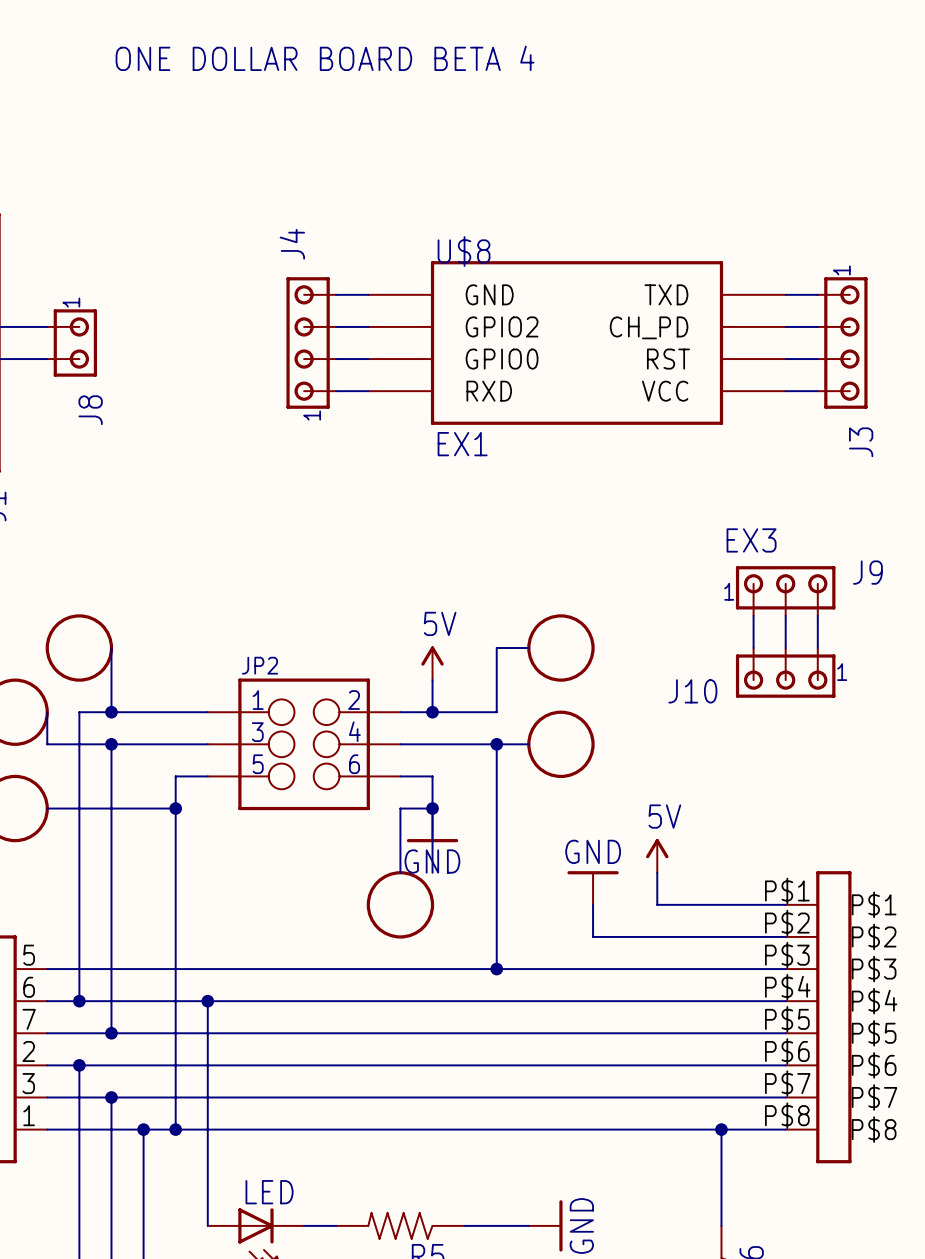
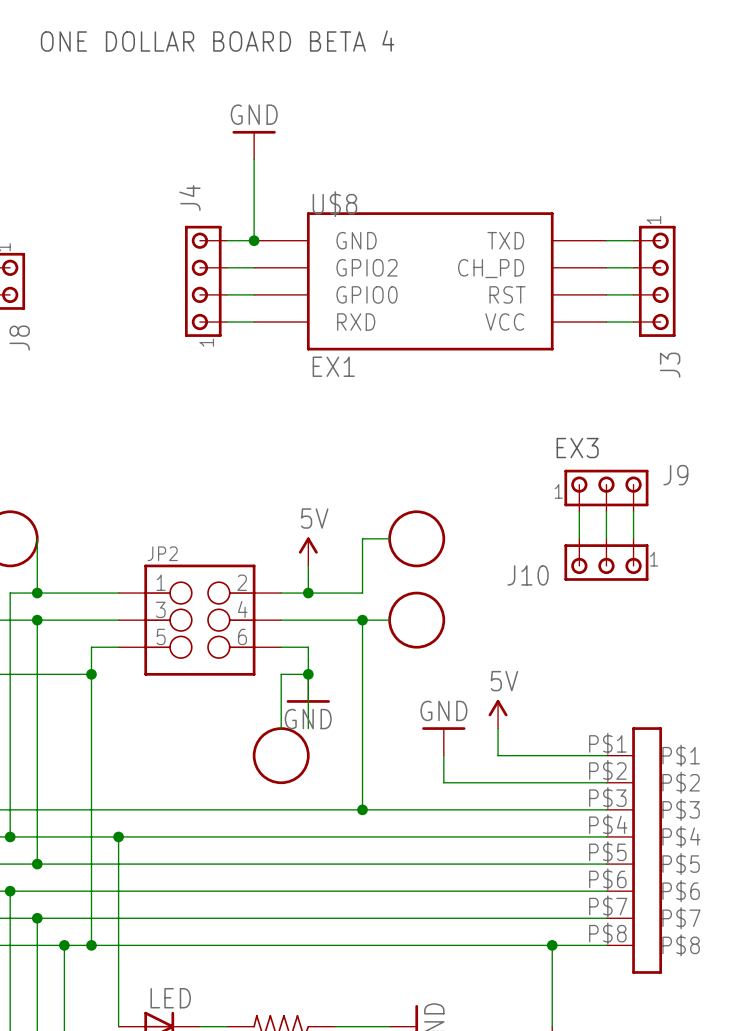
power symbol: none -> GND (254, 145)
wire: none -> (254, 159) (254, 240)
junction: none -> (254, 240)

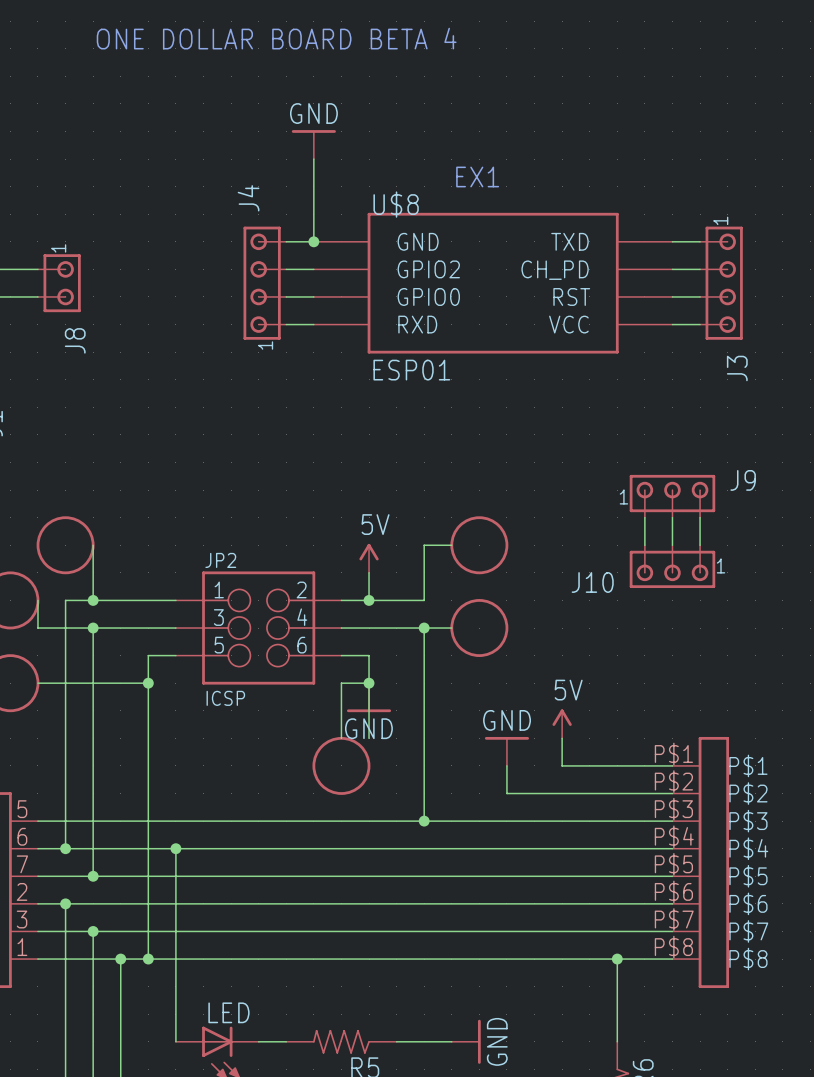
text: none -> EX1 (477, 176)
U$8 value: EX1 (333, 366) -> ESP01 (411, 370)
text: EX3 (577, 448) -> none
JP2 value: none -> ICSP (225, 698)

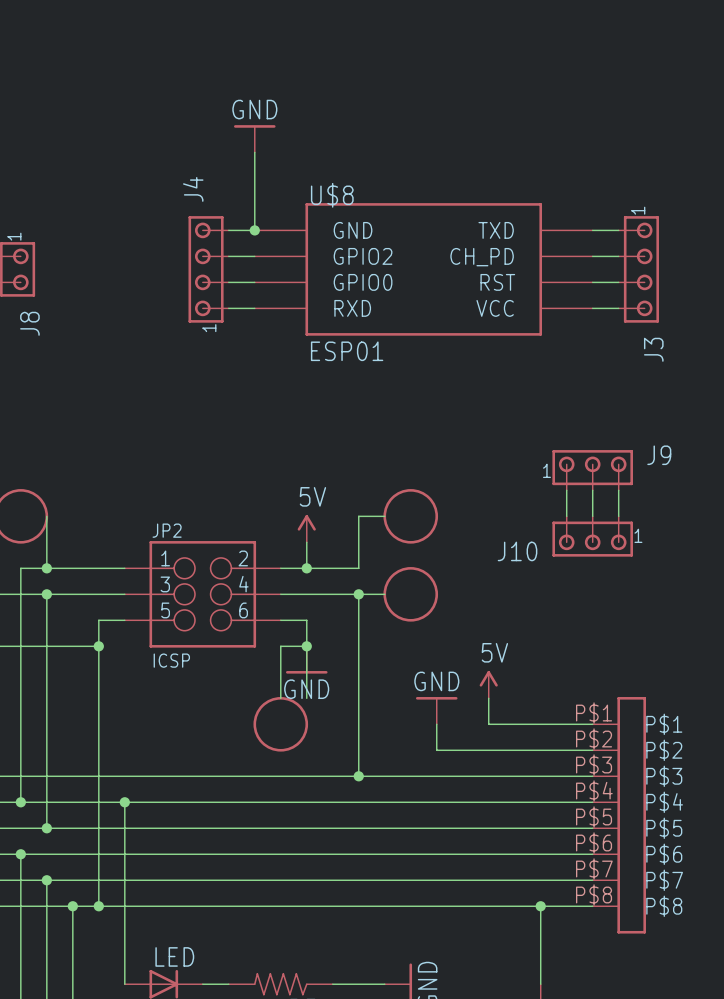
text: ONE DOLLAR BOARD BETA 4 (276, 38) -> none
text: EX1 (477, 176) -> none

